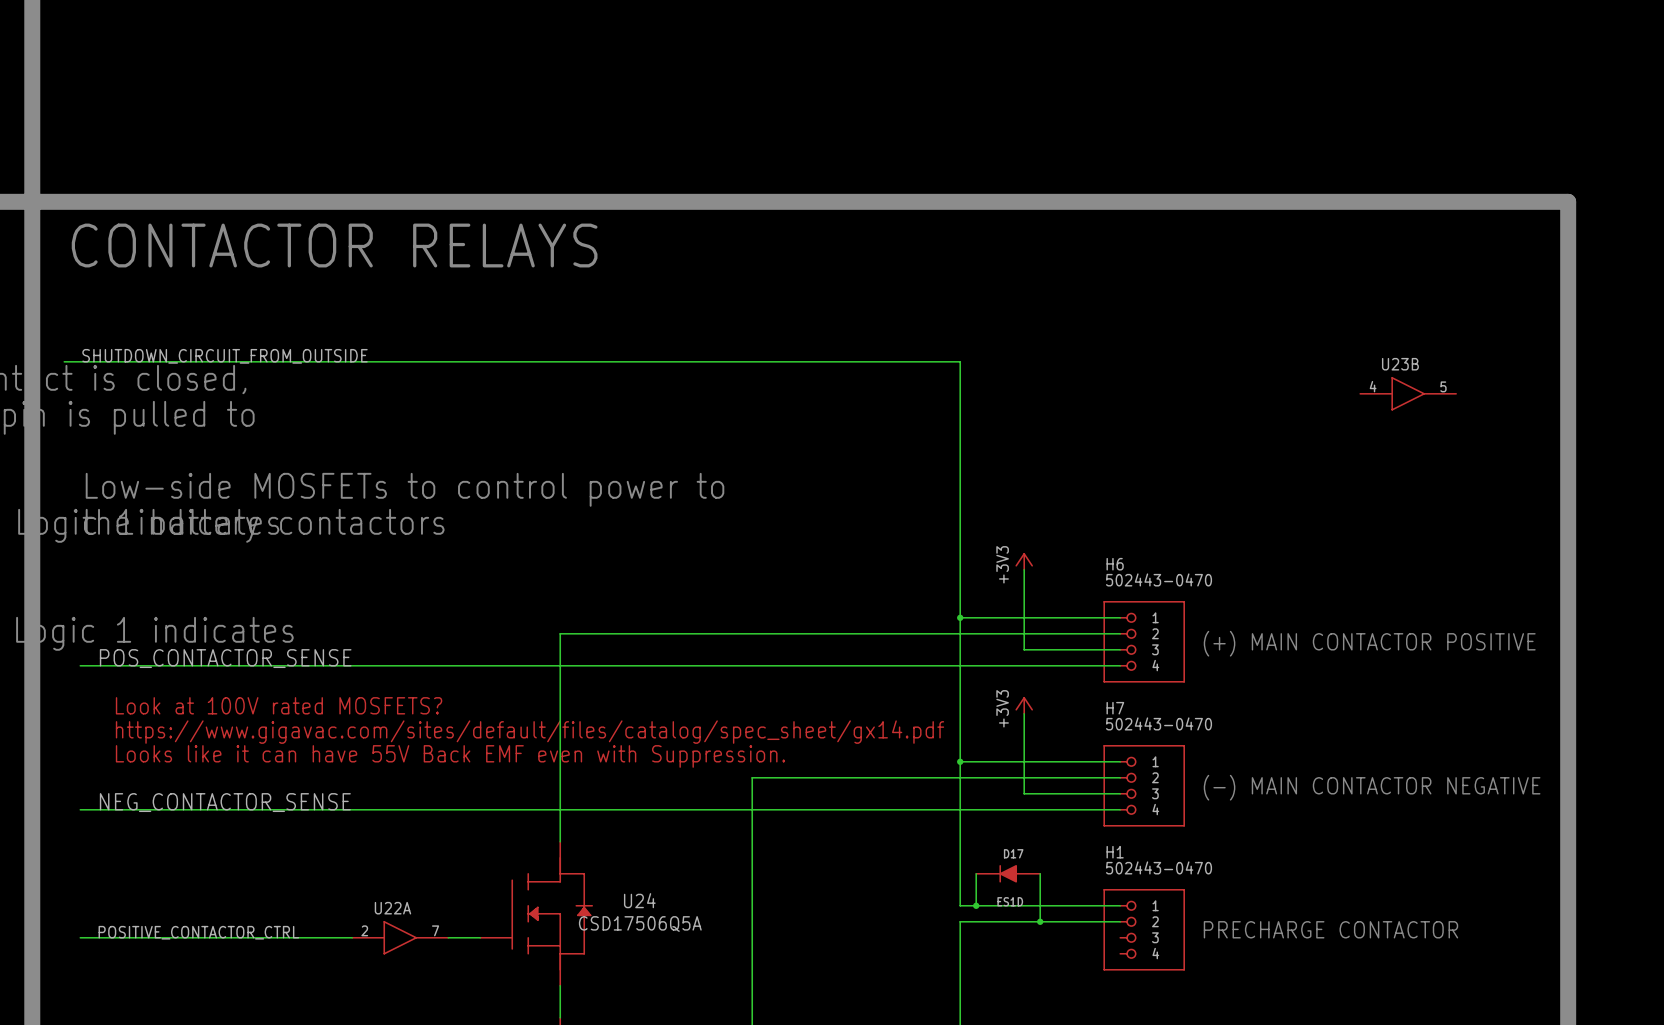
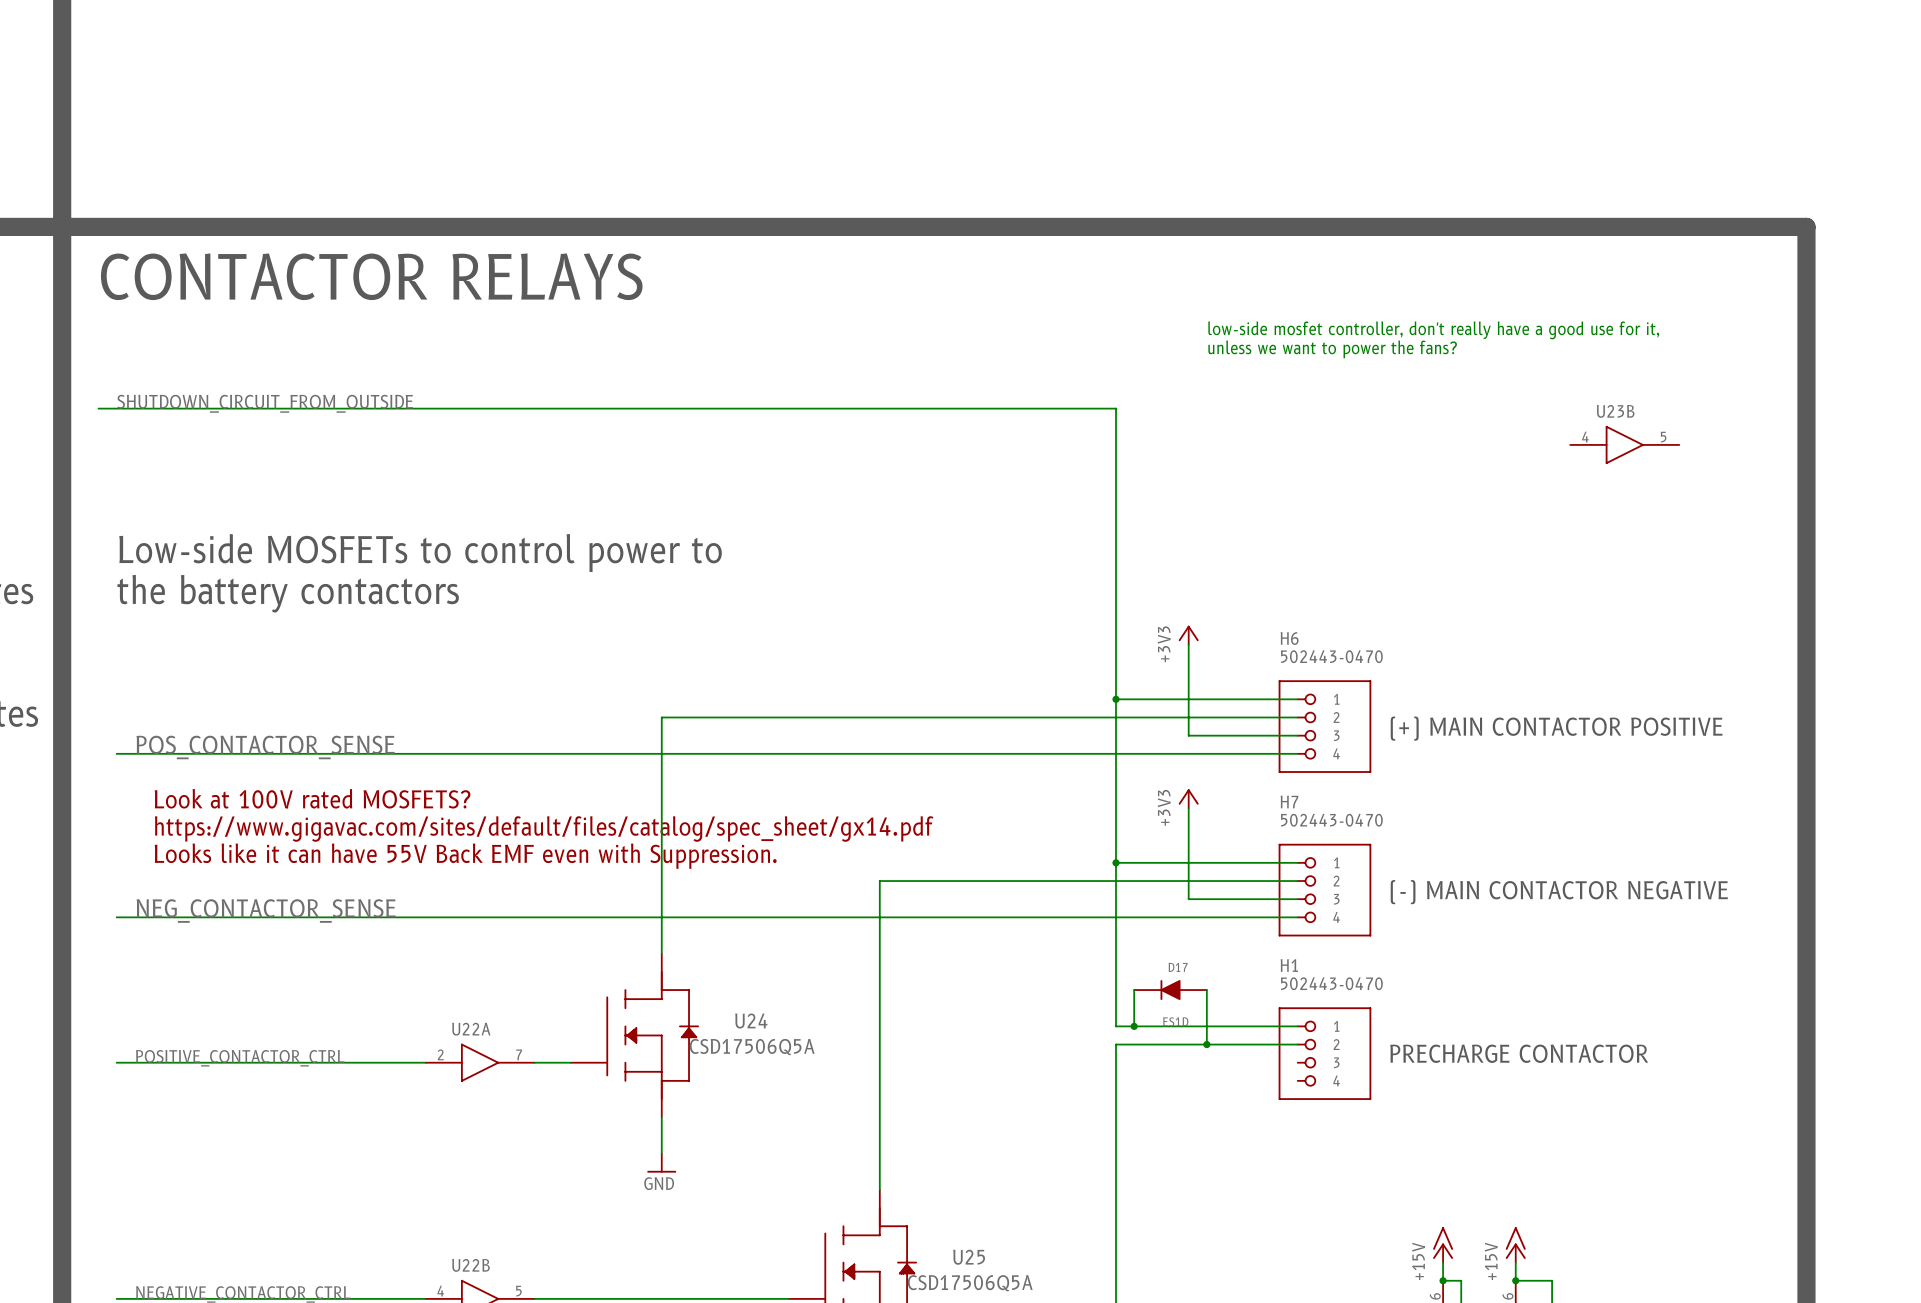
text: none -> low-side mosfet controller, don't really have a good use for it, (1433, 330)
text: none -> unless we want to power the fans? (1332, 349)

